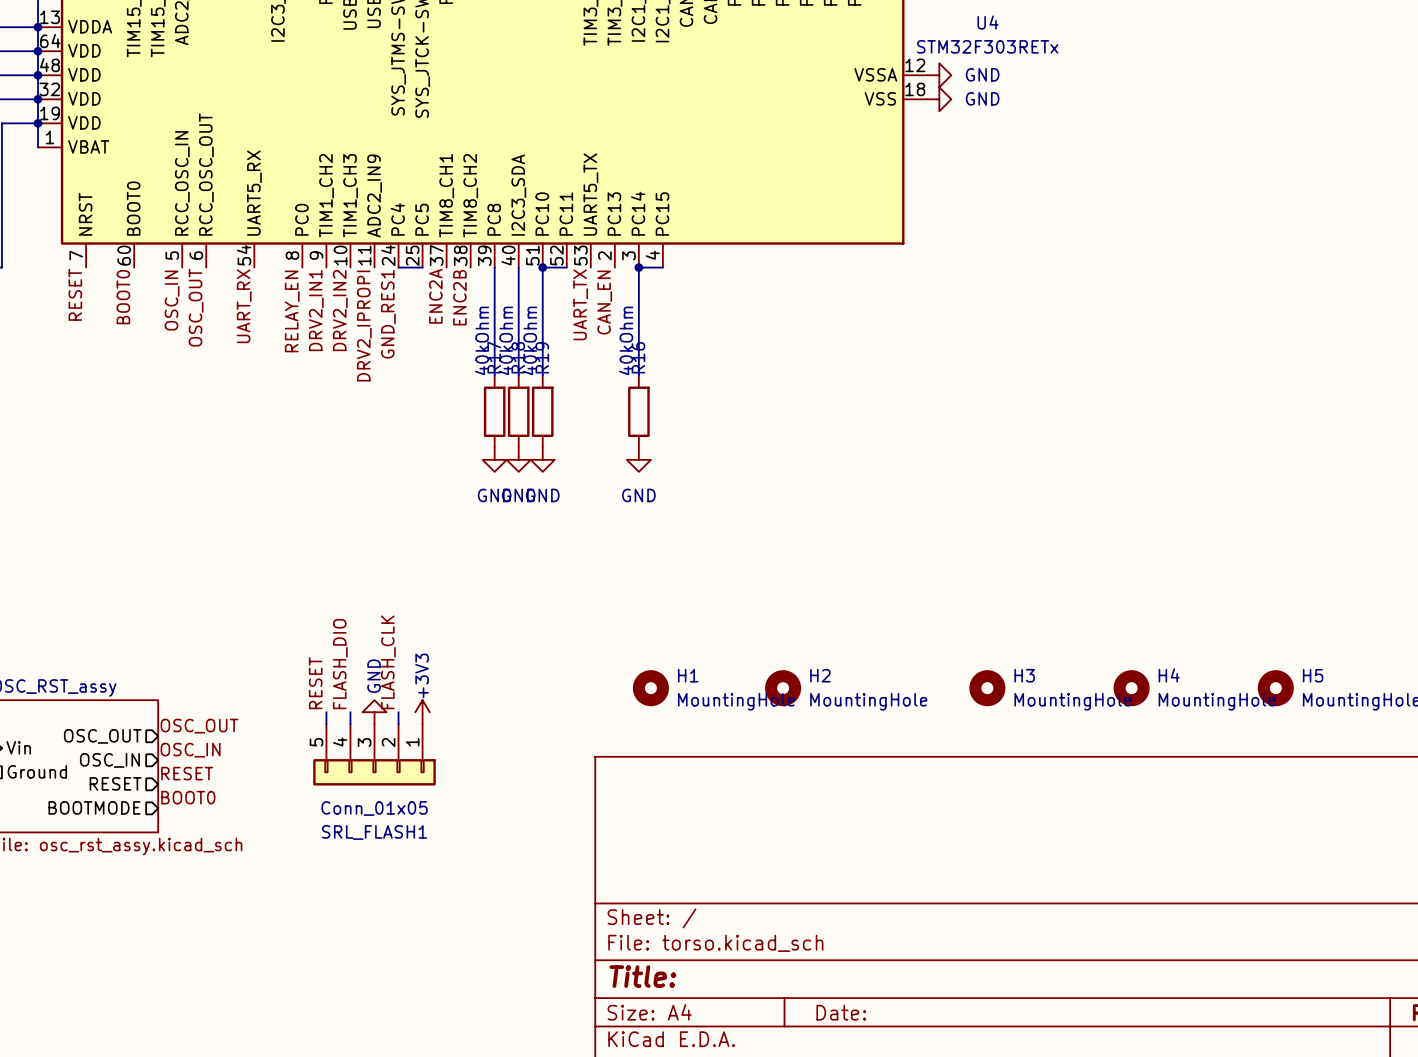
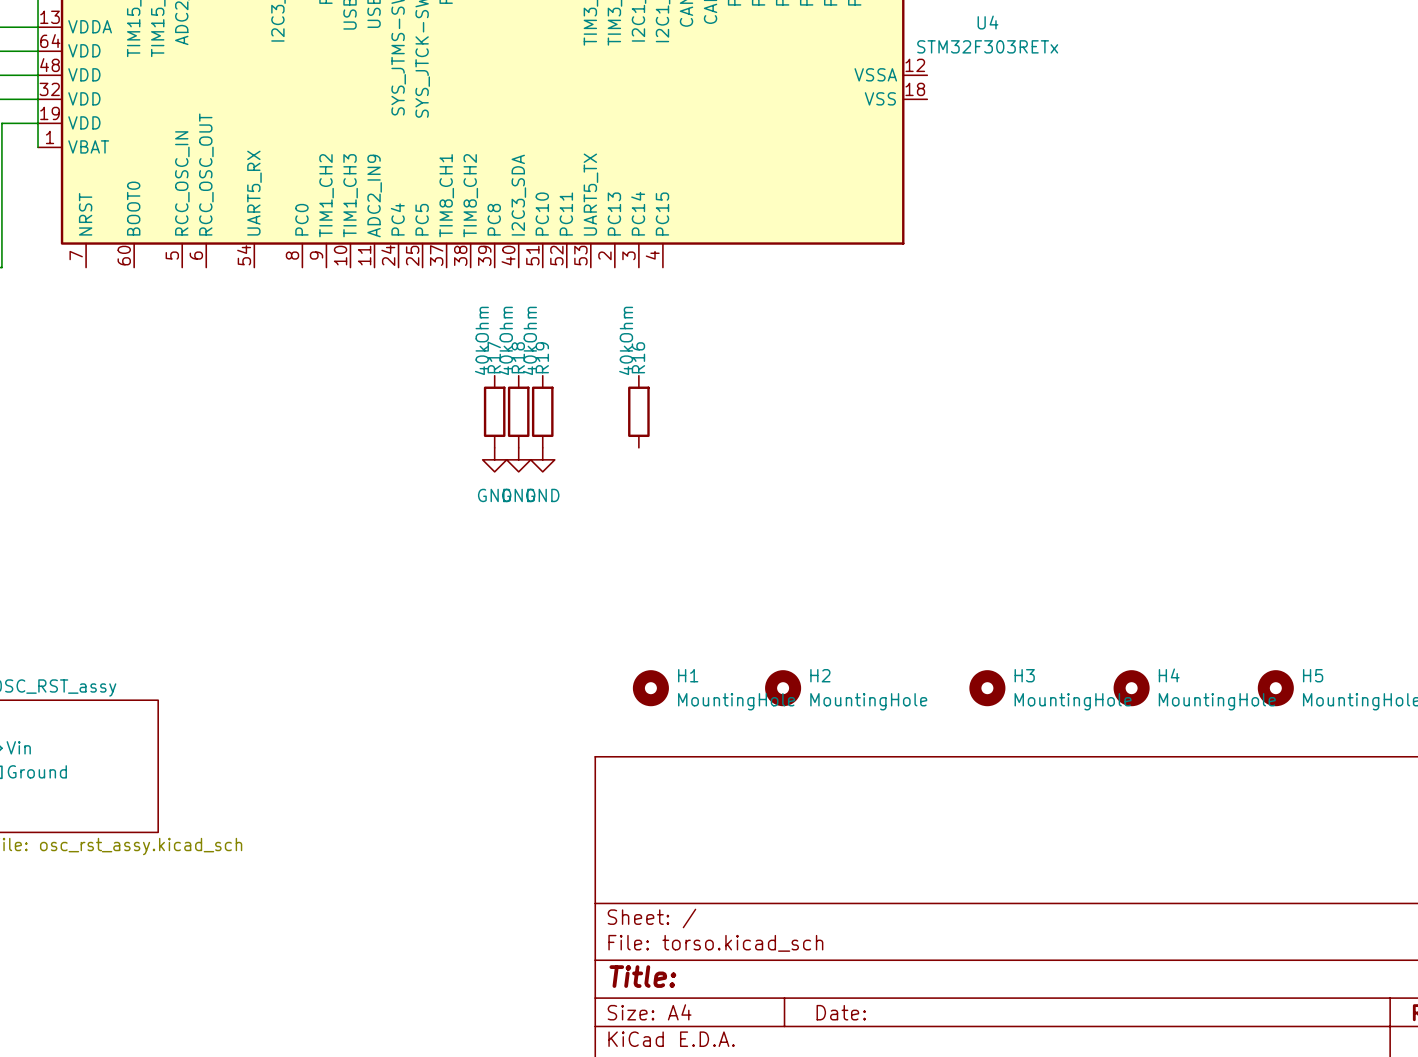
junction: (38, 27) -> none
junction: (38, 51) -> none
junction: (38, 75) -> none
power symbol: GND (939, 75) -> none
junction: (38, 99) -> none
power symbol: GND (939, 99) -> none
junction: (38, 123) -> none
wire: (398, 267) (422, 267) -> none
wire: (494, 267) (494, 375) -> none
wire: (518, 267) (518, 375) -> none
junction: (542, 267) -> none
wire: (566, 267) (542, 267) (542, 375) -> none
junction: (638, 267) -> none
wire: (662, 267) (638, 267) (638, 375) -> none
label: RESET (75, 294) -> none
label: ENC2A (435, 296) -> none
label: BOOT0 (123, 297) -> none
label: ENC2B (459, 297) -> none
label: OSC_IN (172, 300) -> none
label: CAN_EN (604, 302) -> none
label: UART_TX (580, 304) -> none
label: UART_RX (244, 306) -> none
label: OSC_OUT (196, 307) -> none
label: DRV2_IN1 (316, 310) -> none
label: DRV2_IN2 (340, 310) -> none
label: RELAY_EN (292, 311) -> none
label: GND_RES1 (388, 314) -> none
label: DRV2_IPROPI (364, 326) -> none
power symbol: GND (638, 459) -> none
label: FLASH_CLK (388, 662) -> none
label: FLASH_DIO (340, 664) -> none
label: RESET (315, 683) -> none
wire: (326, 712) (326, 724) -> none
wire: (350, 712) (350, 724) -> none
power symbol: GND (374, 712) -> none
wire: (398, 712) (398, 724) -> none
power symbol: +3V3 (422, 712) -> none
label: OSC_OUT (199, 726) -> none
sheet pin: OSC_OUT (102, 736) -> none
label: OSC_IN (190, 750) -> none
SRL_FLASH1: Conn_01x05 (374, 754) -> none
sheet pin: OSC_IN (109, 760) -> none
label: RESET (187, 773) -> none
sheet pin: RESET (115, 783) -> none
label: BOOT0 (188, 797) -> none
sheet pin: BOOTMODE (94, 807) -> none

